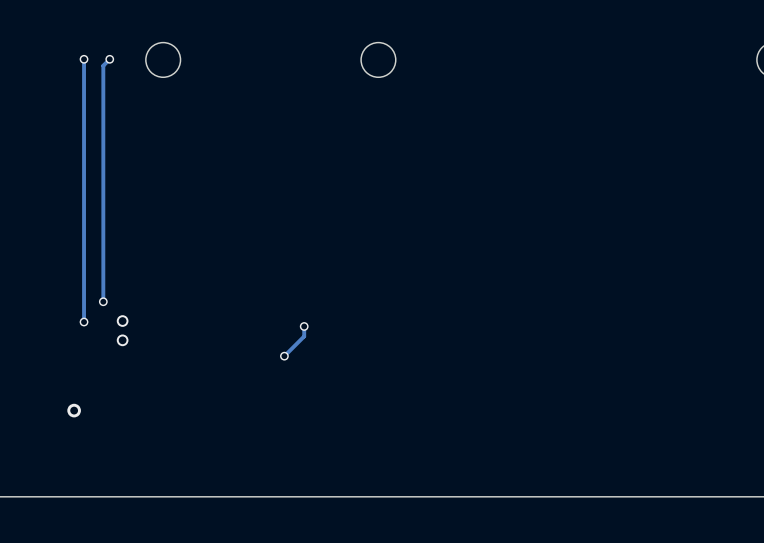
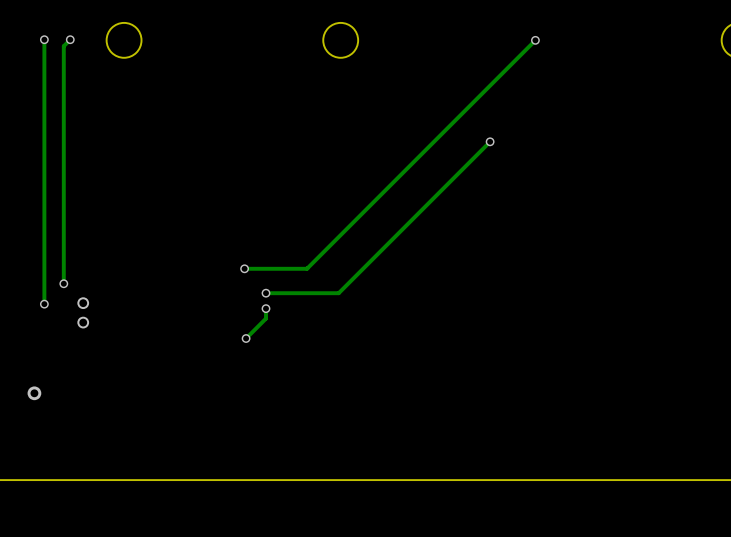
track: none -> (535, 40) (306, 268) (244, 268)
via: none -> (535, 40)
track: none -> (490, 141) (338, 293) (266, 293)
via: none -> (490, 141)
via: none -> (244, 268)
via: none -> (266, 293)

